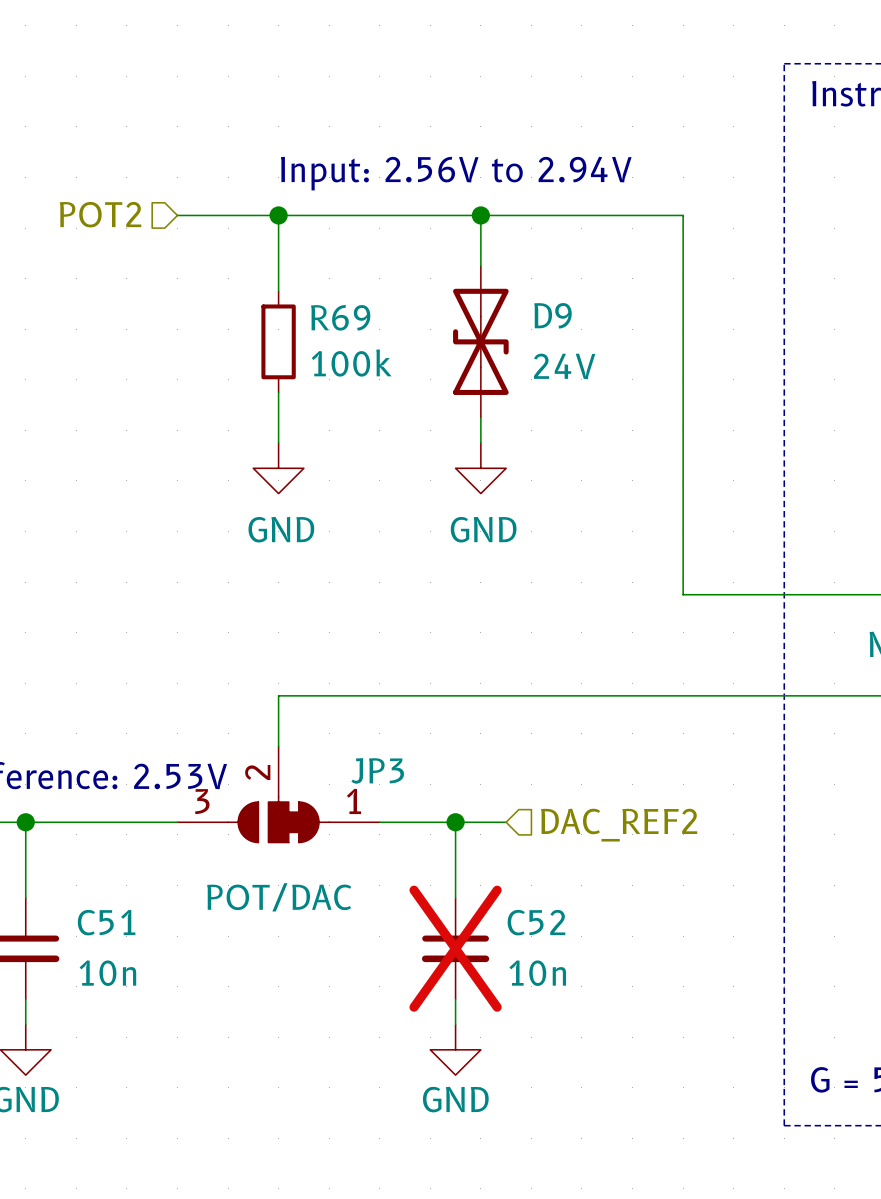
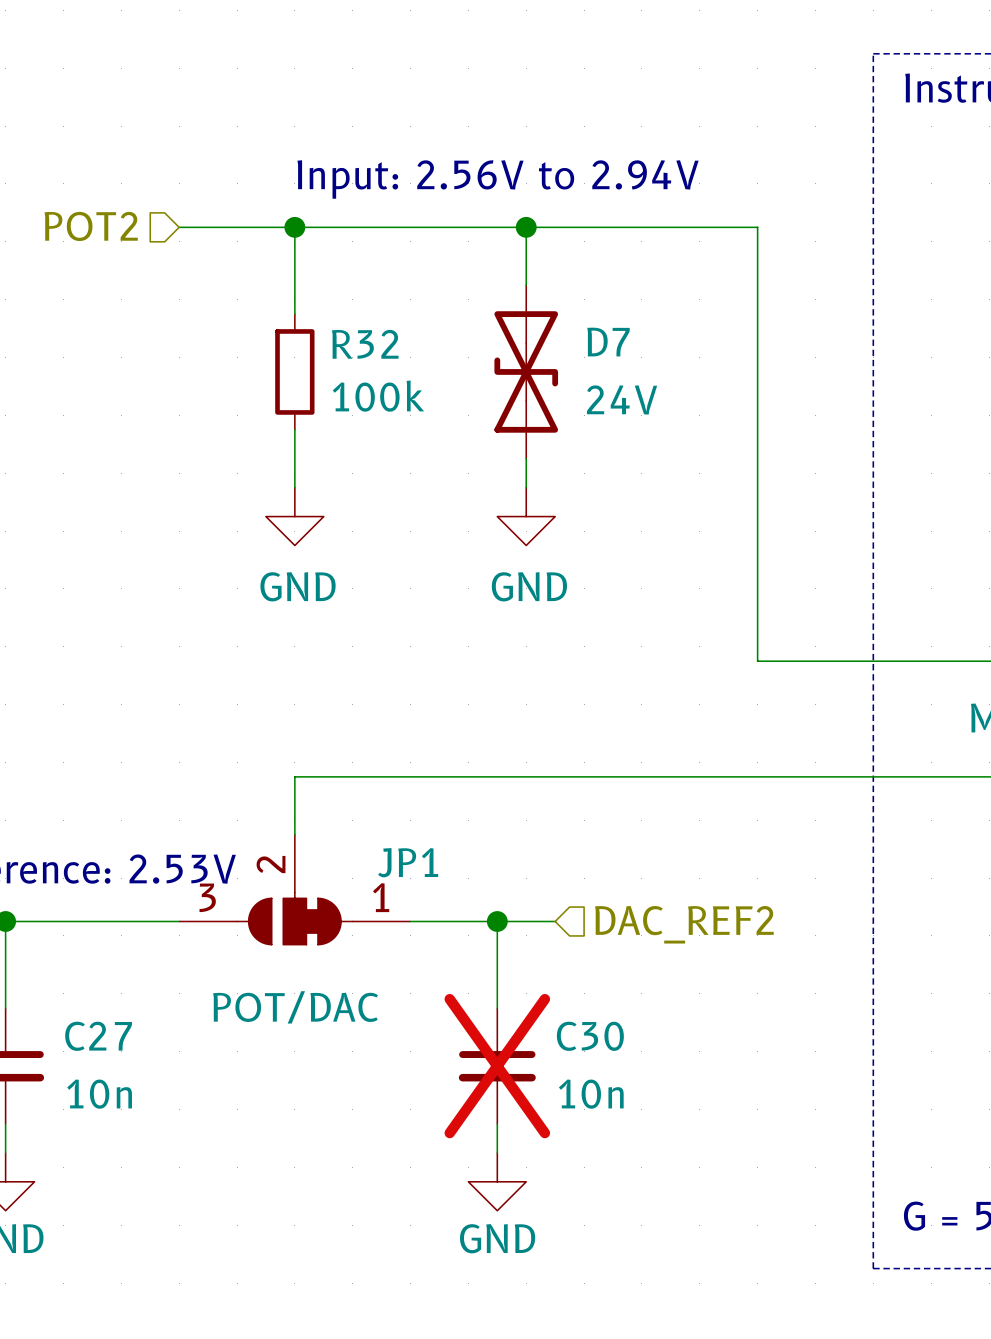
D9 name: D9 (552, 315) -> D7 (608, 342)
R69 name: R69 (340, 317) -> R32 (365, 344)
JP3 name: JP3 (377, 770) -> JP1 (408, 862)
C51 name: C51 (106, 922) -> C27 (98, 1036)
C52 name: C52 (536, 922) -> C30 (590, 1036)

